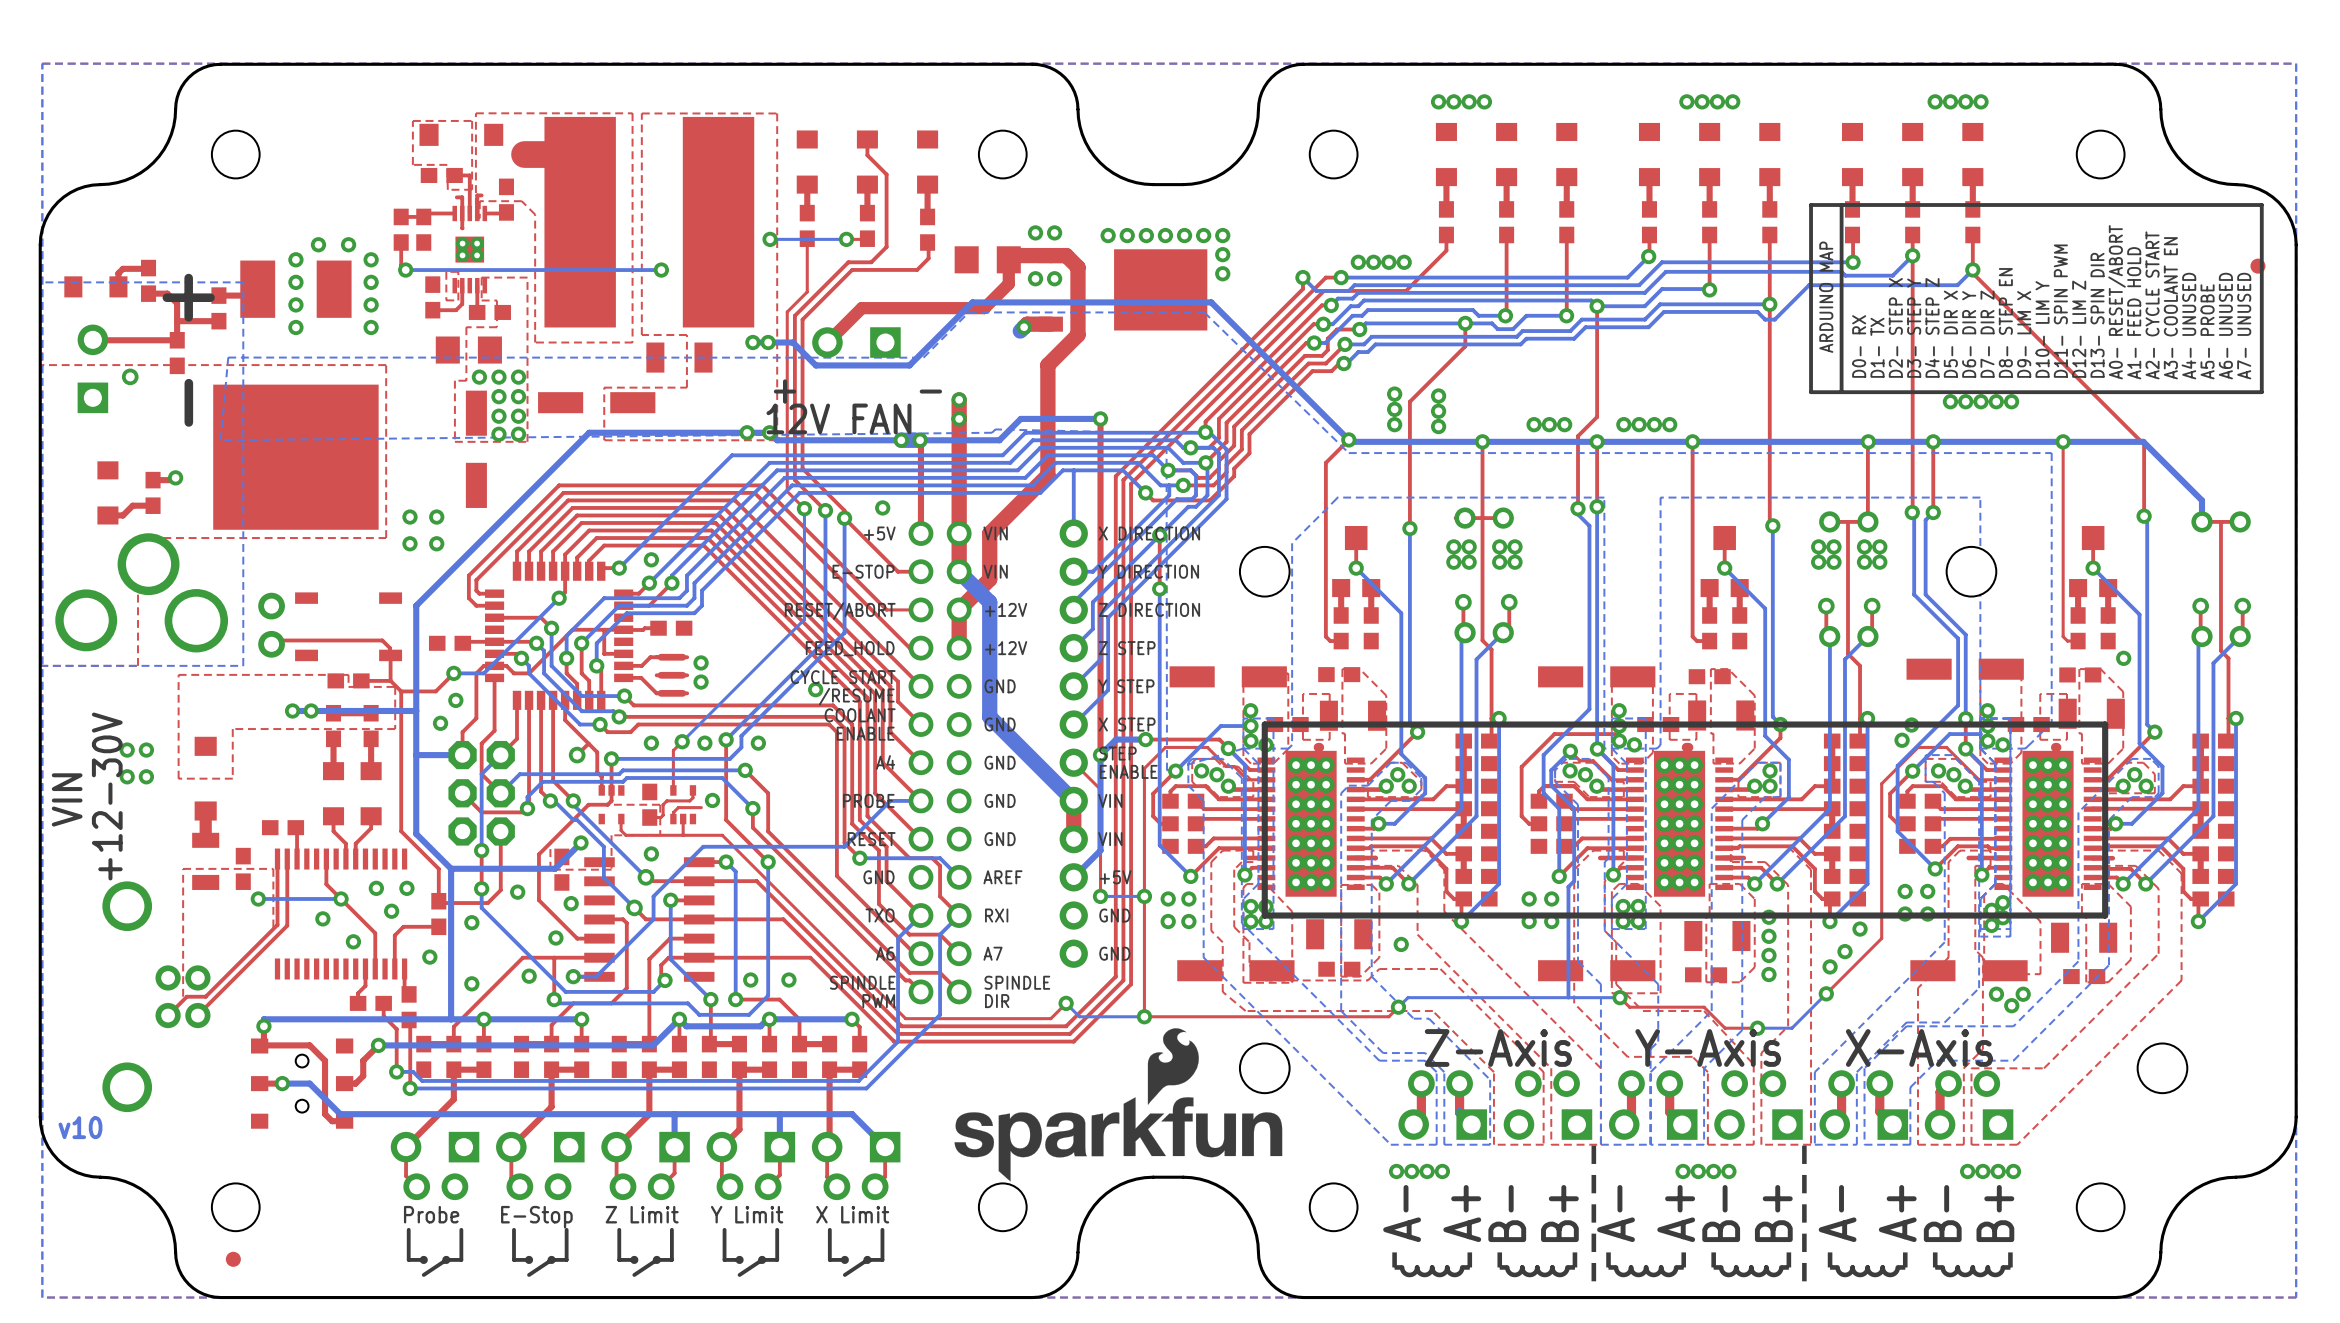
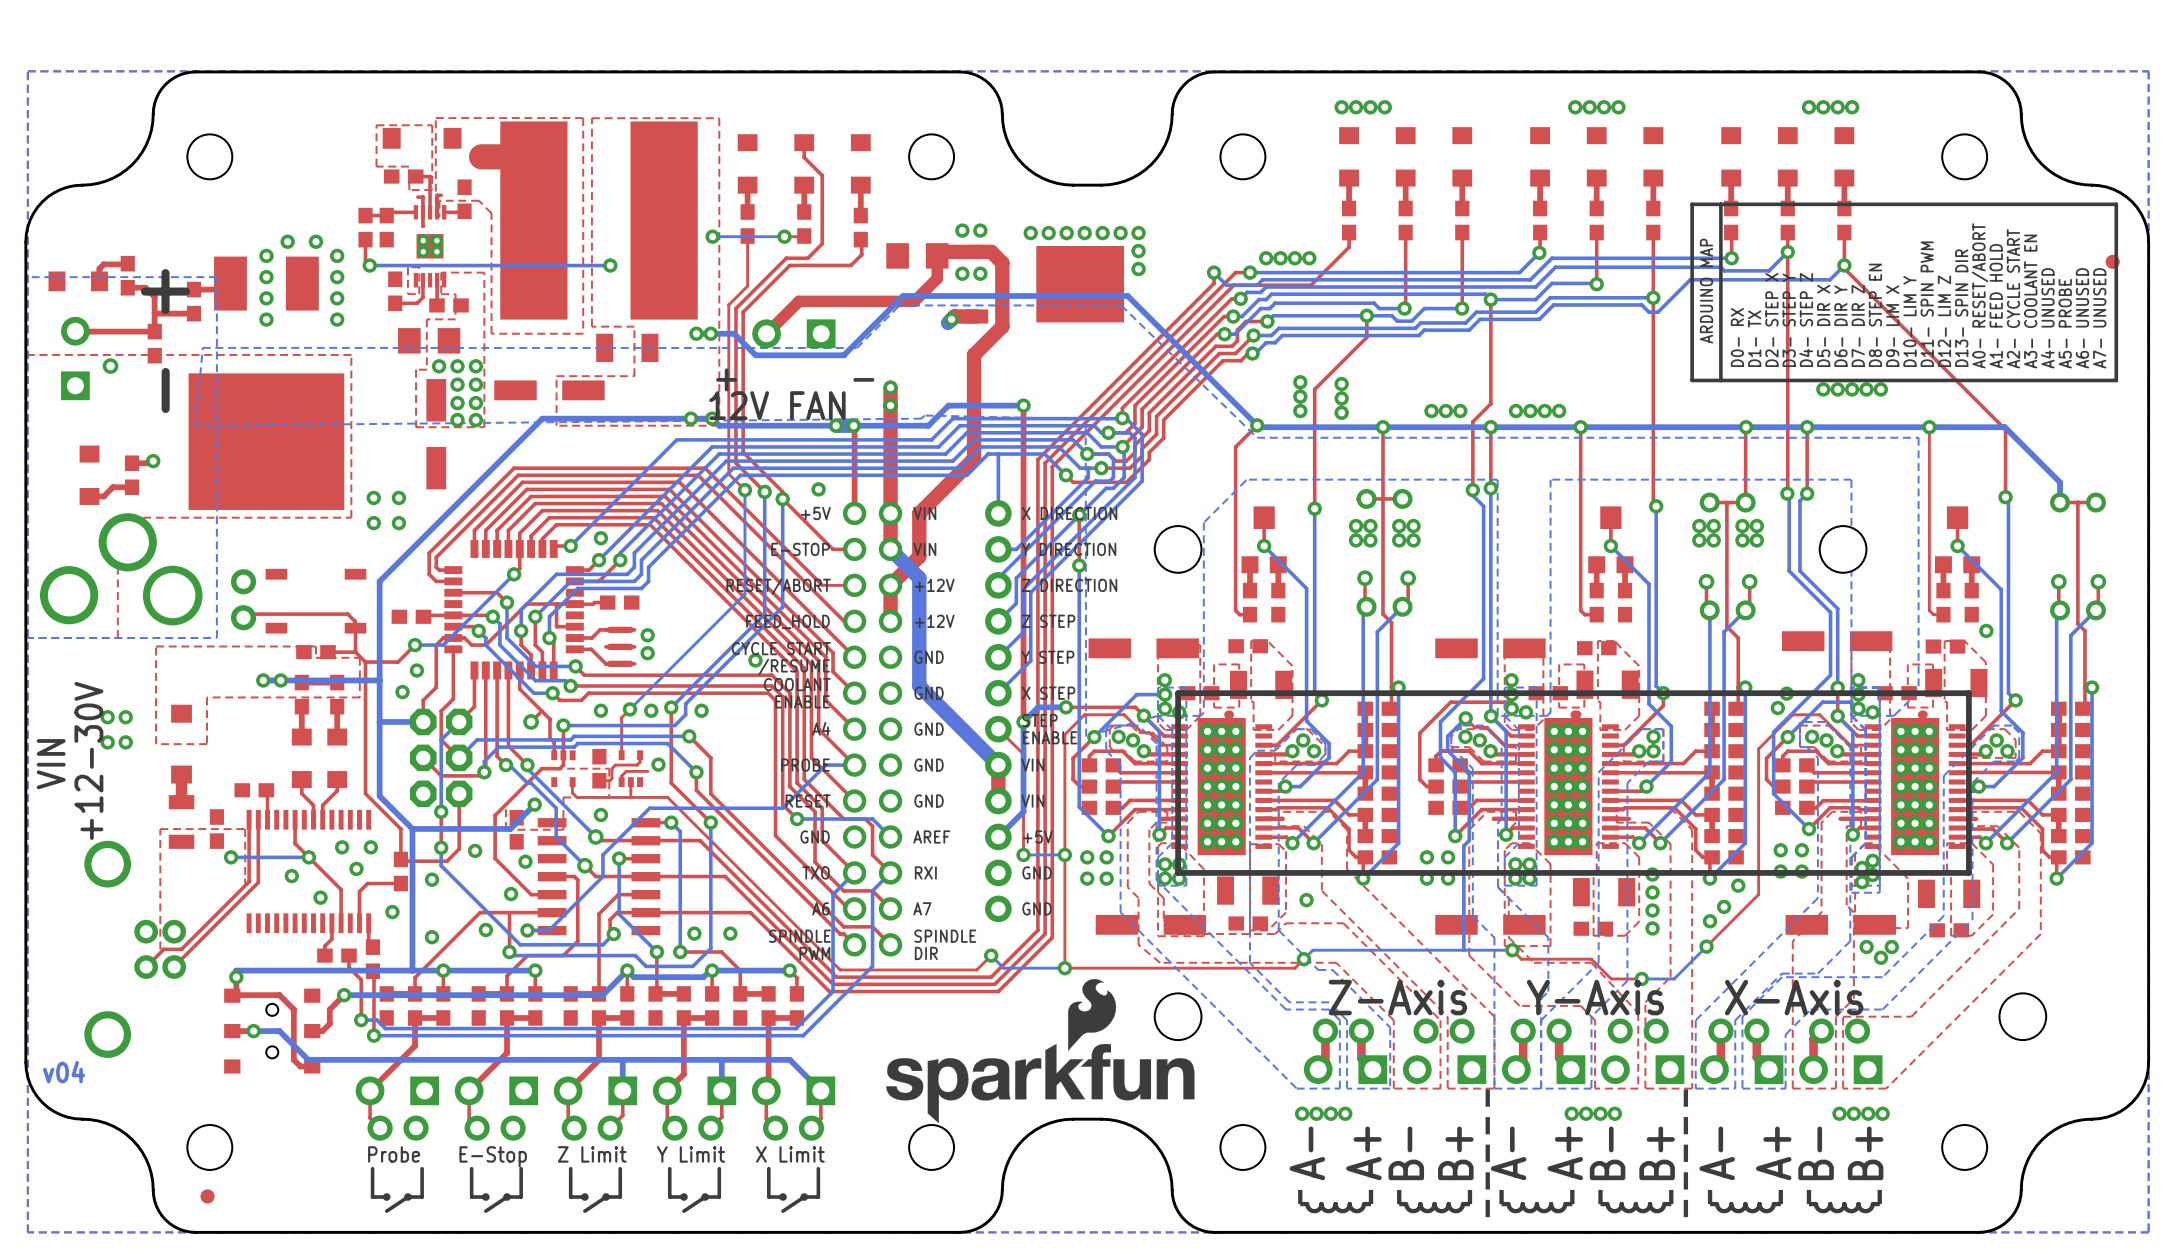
text: v10 (80, 1127) -> v04 (64, 1072)

